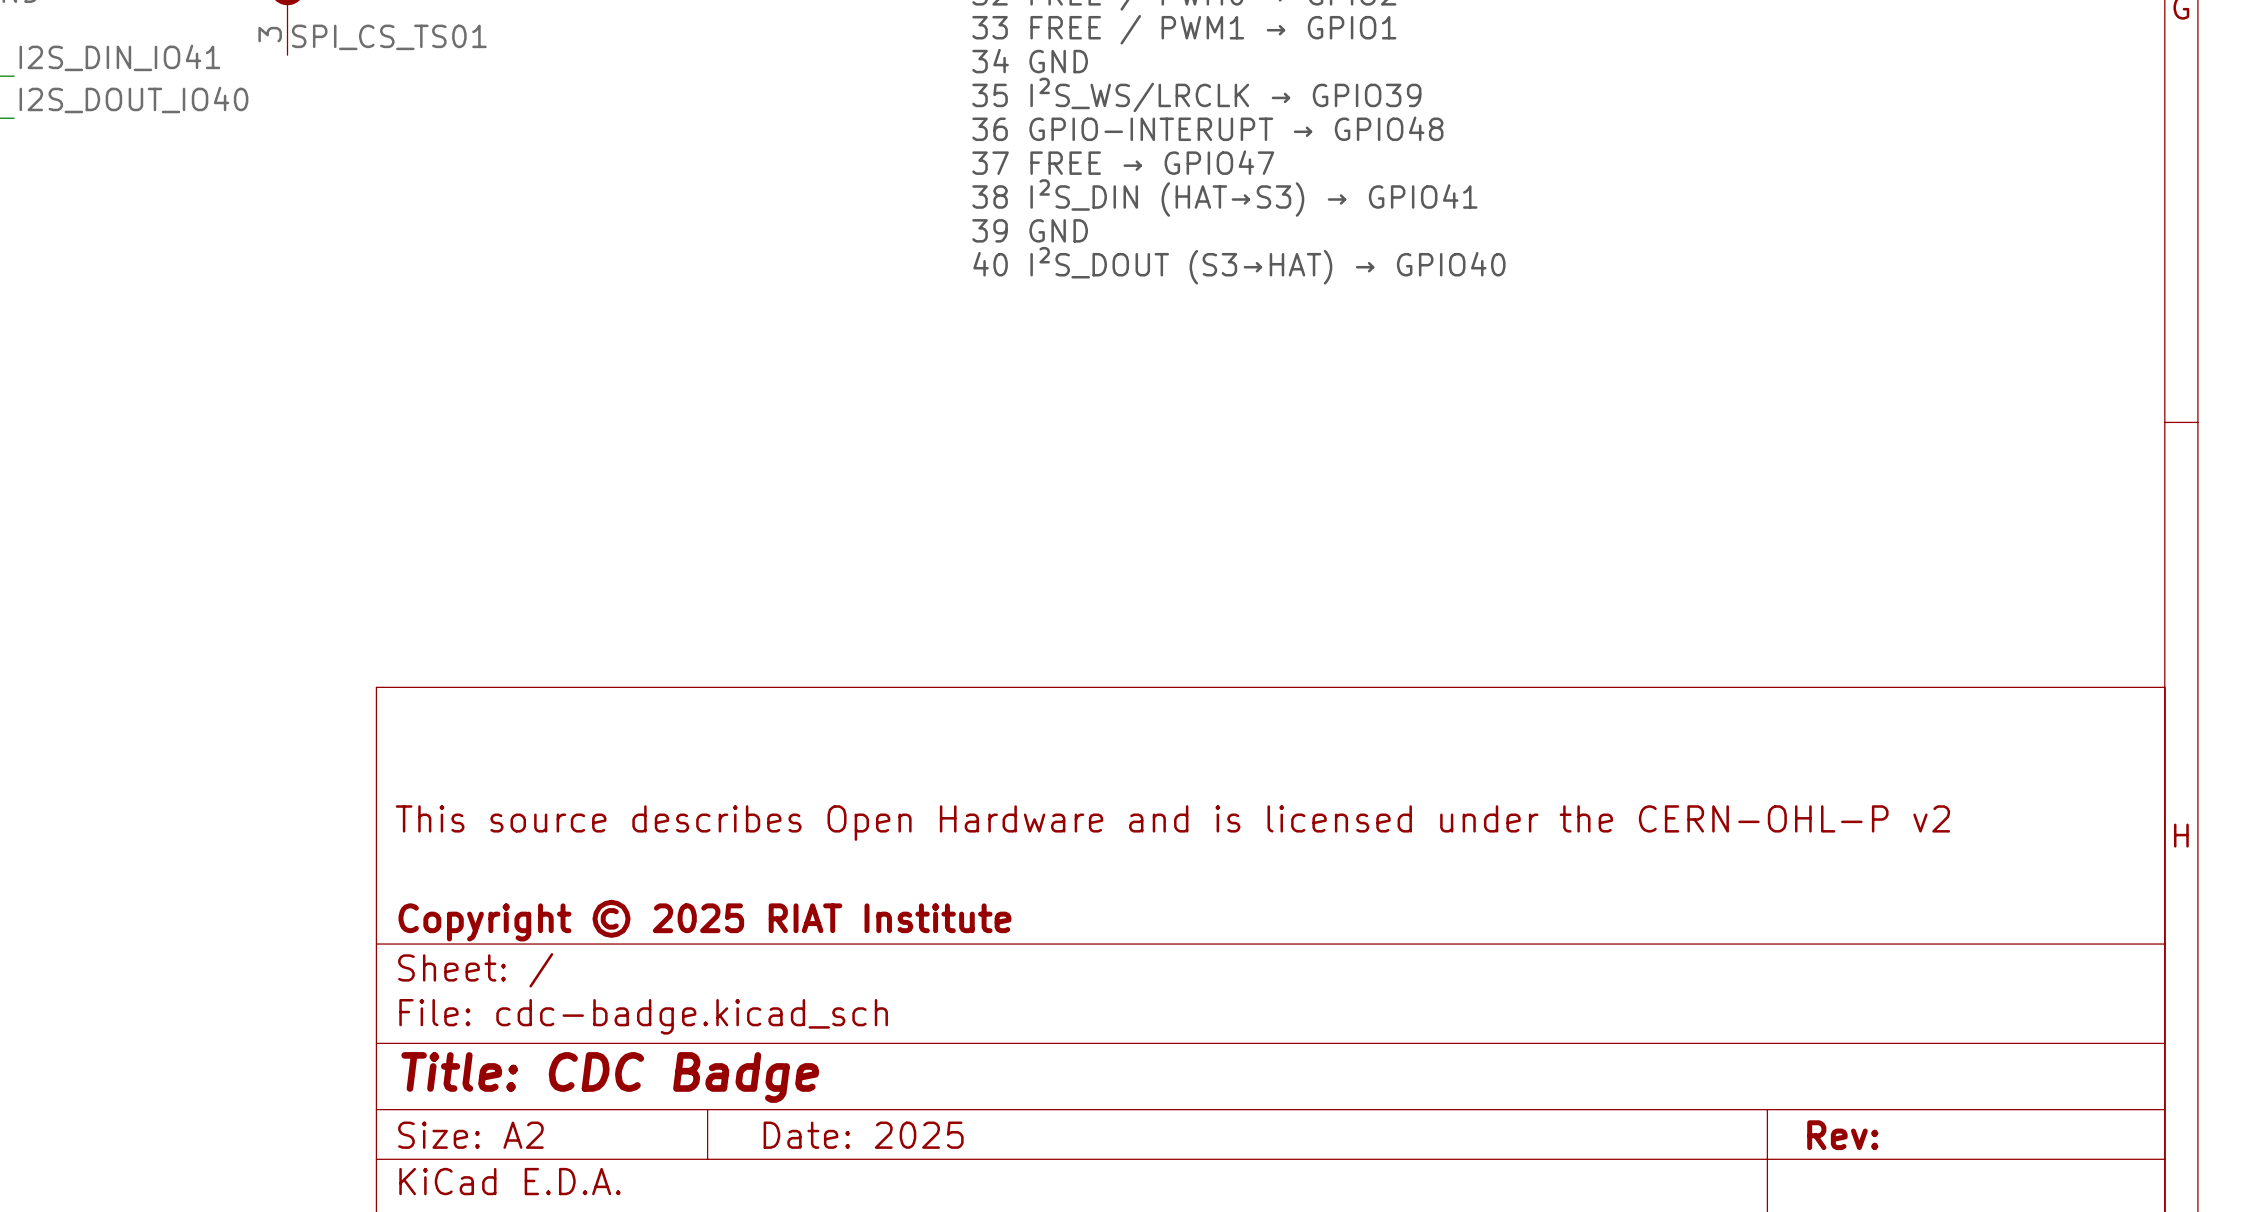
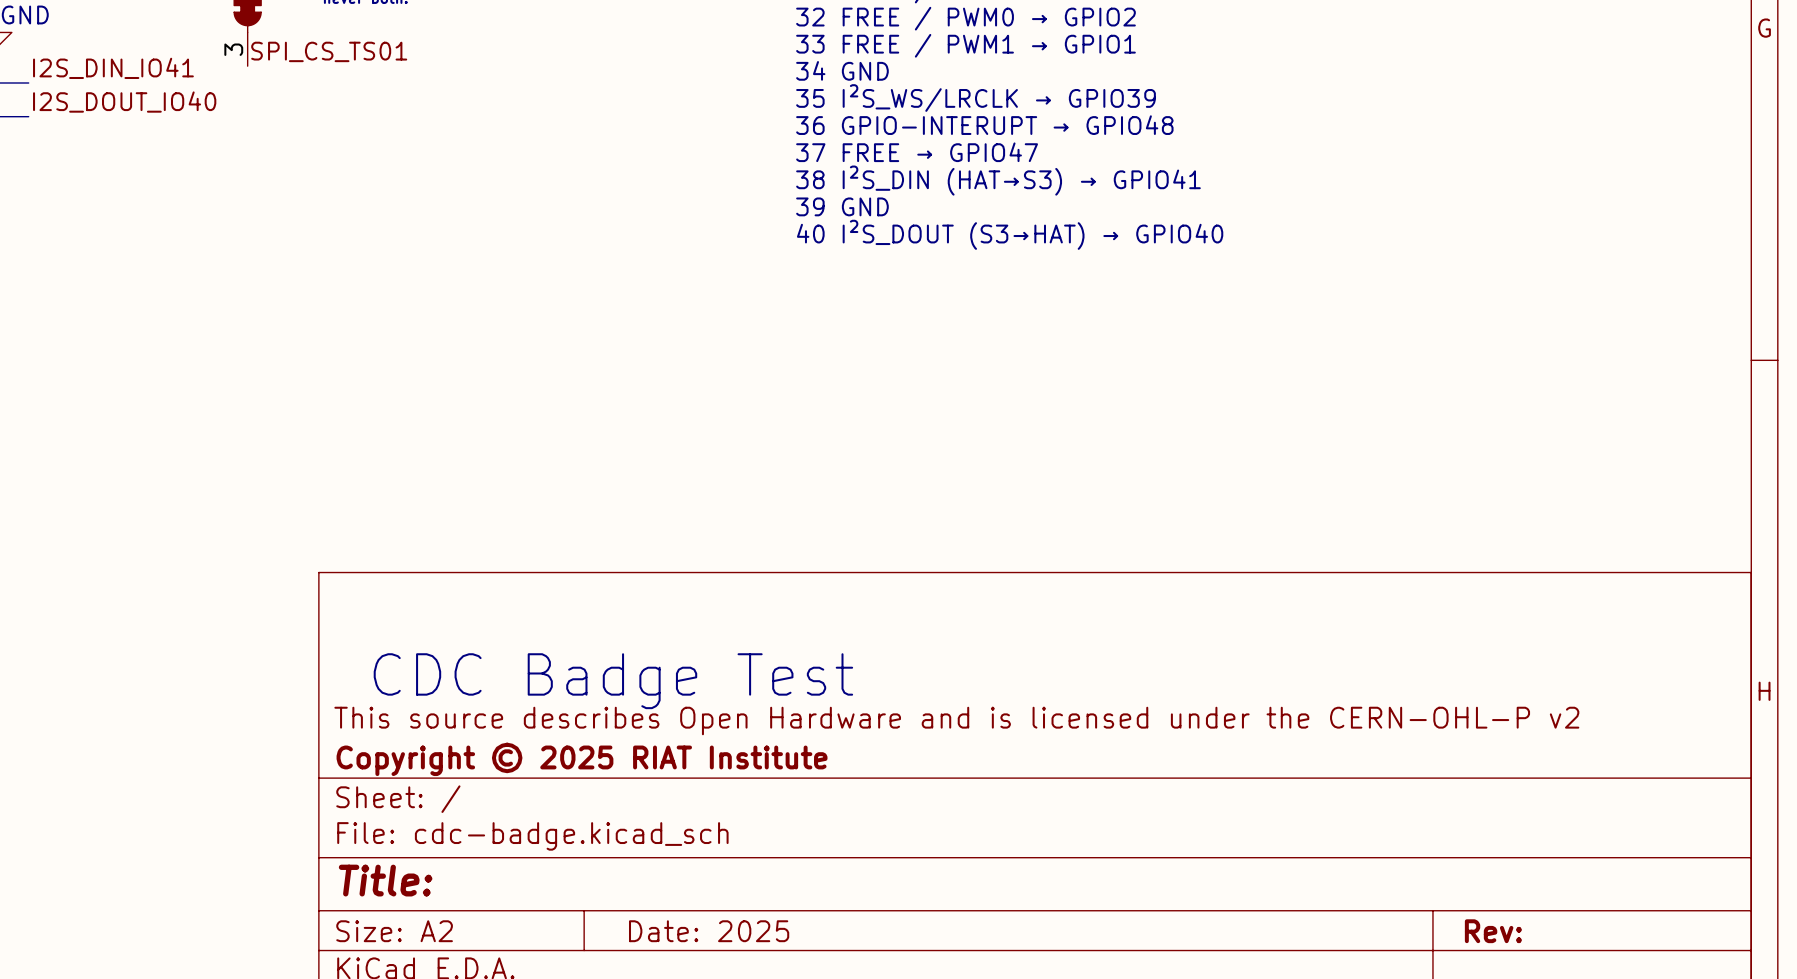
text: none -> CDC Badge Test (613, 681)
title block position: This source describes Open Hardware and is licensed under the CERN-OHL-P v2 (1172, 823) -> This source describes Open Hardware and is licensed under the CERN-OHL-P v2 (956, 721)
title block: Title: CDC Badge (610, 1077) -> Title: (385, 880)

